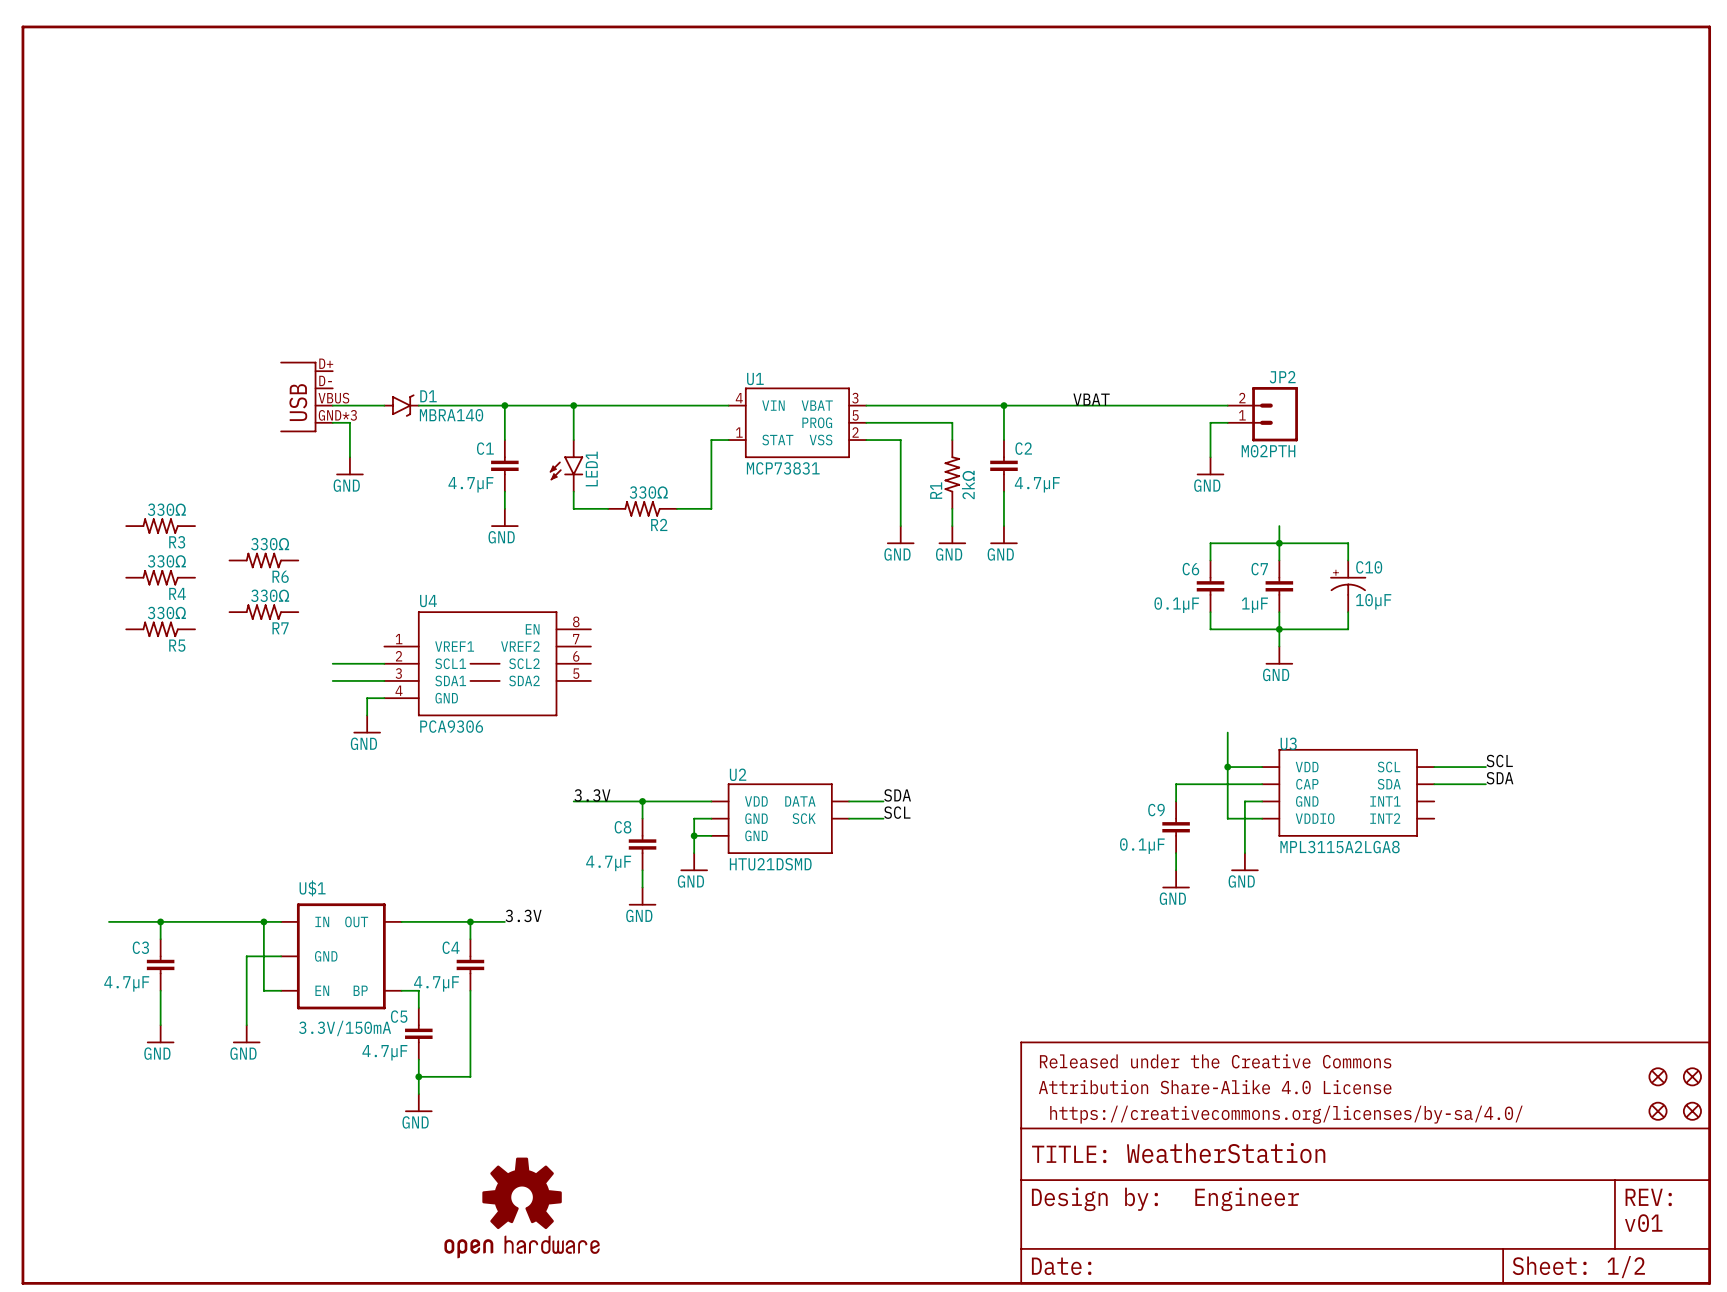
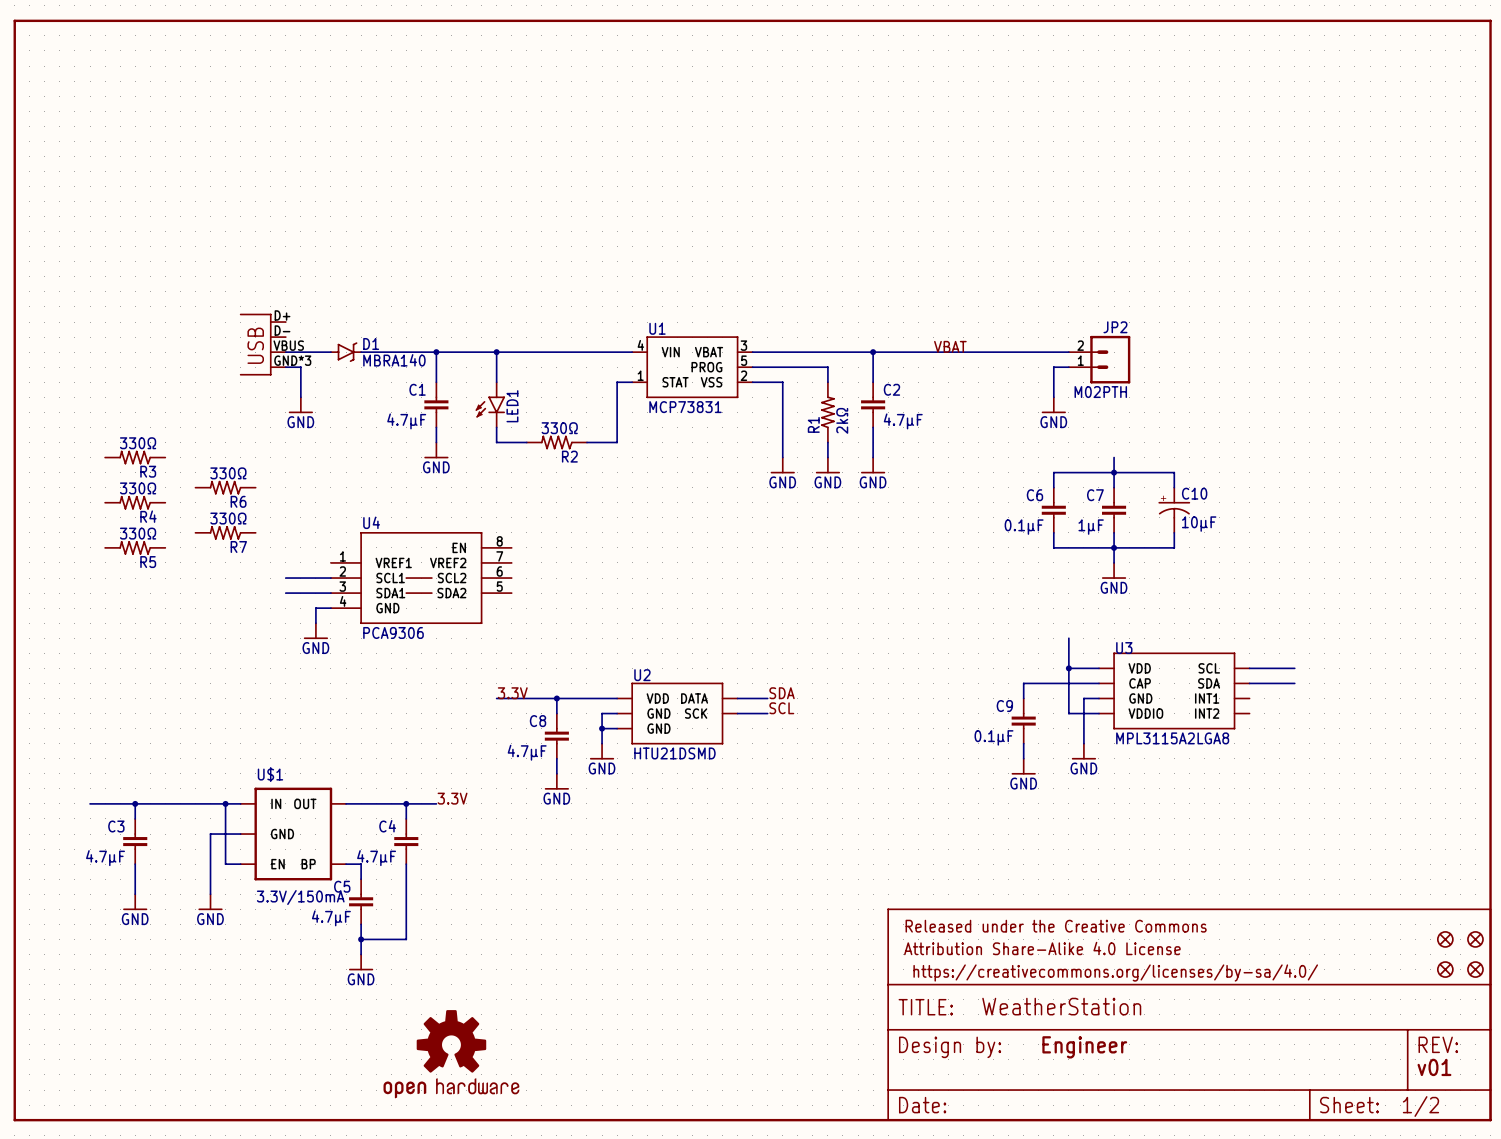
label: SCL (1499, 761) -> none
label: SDA (1499, 778) -> none

